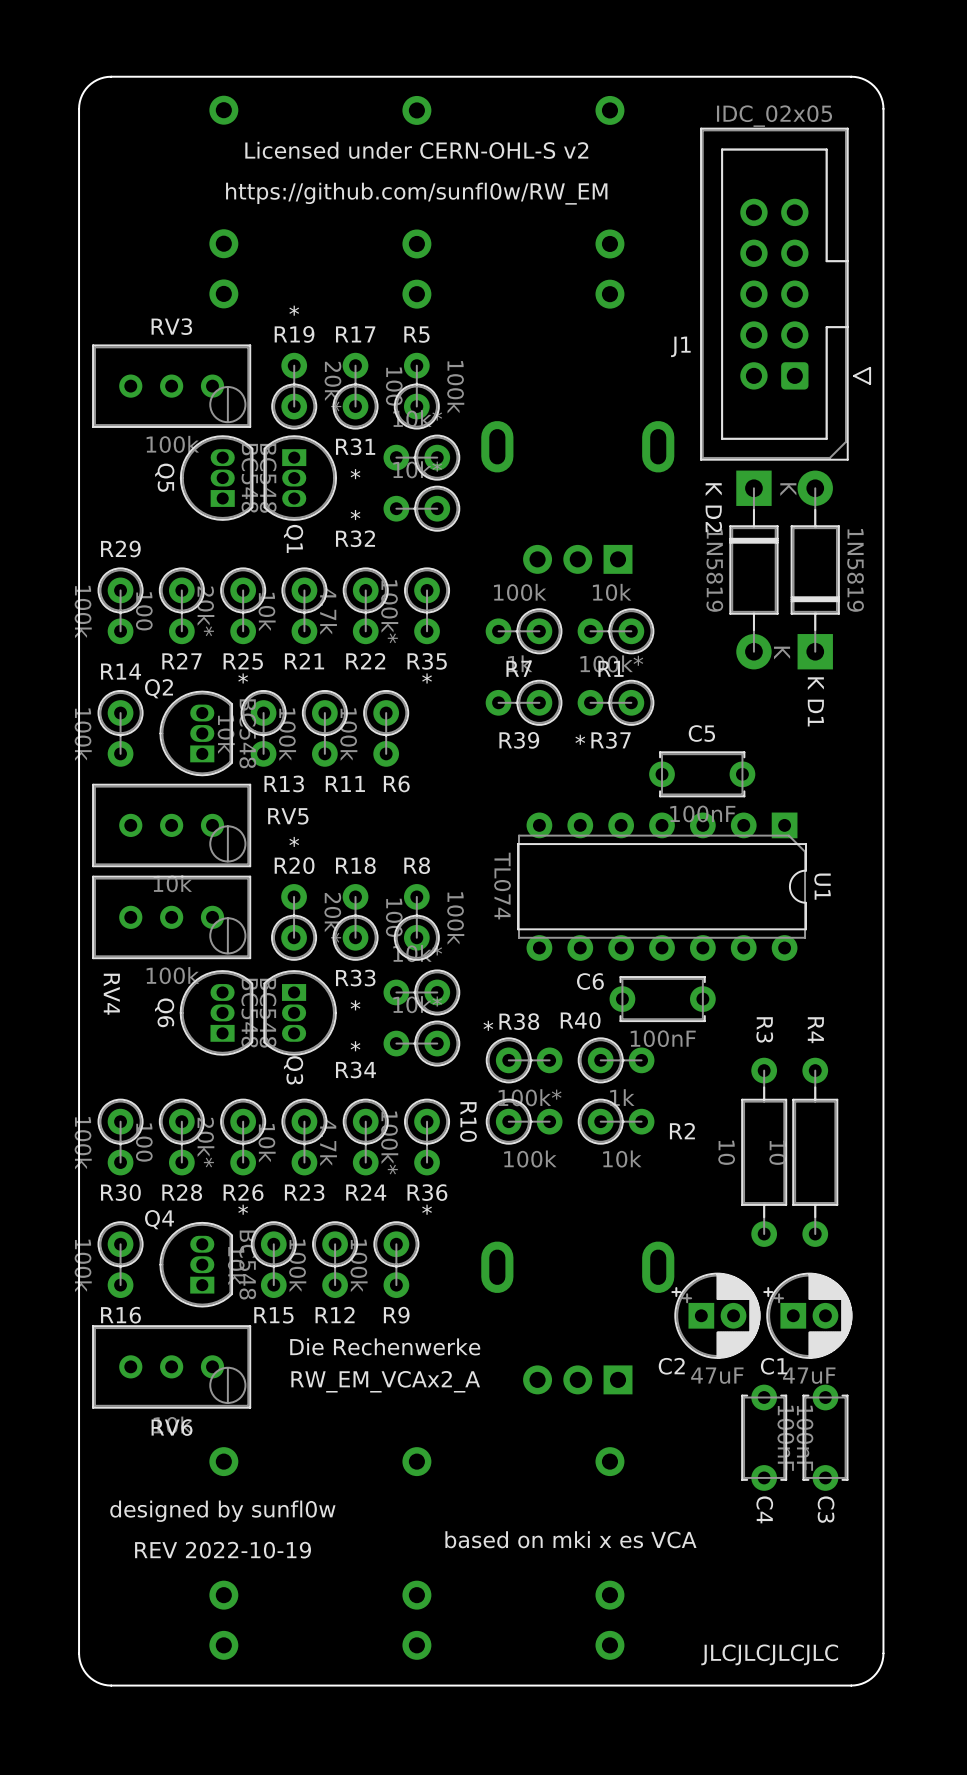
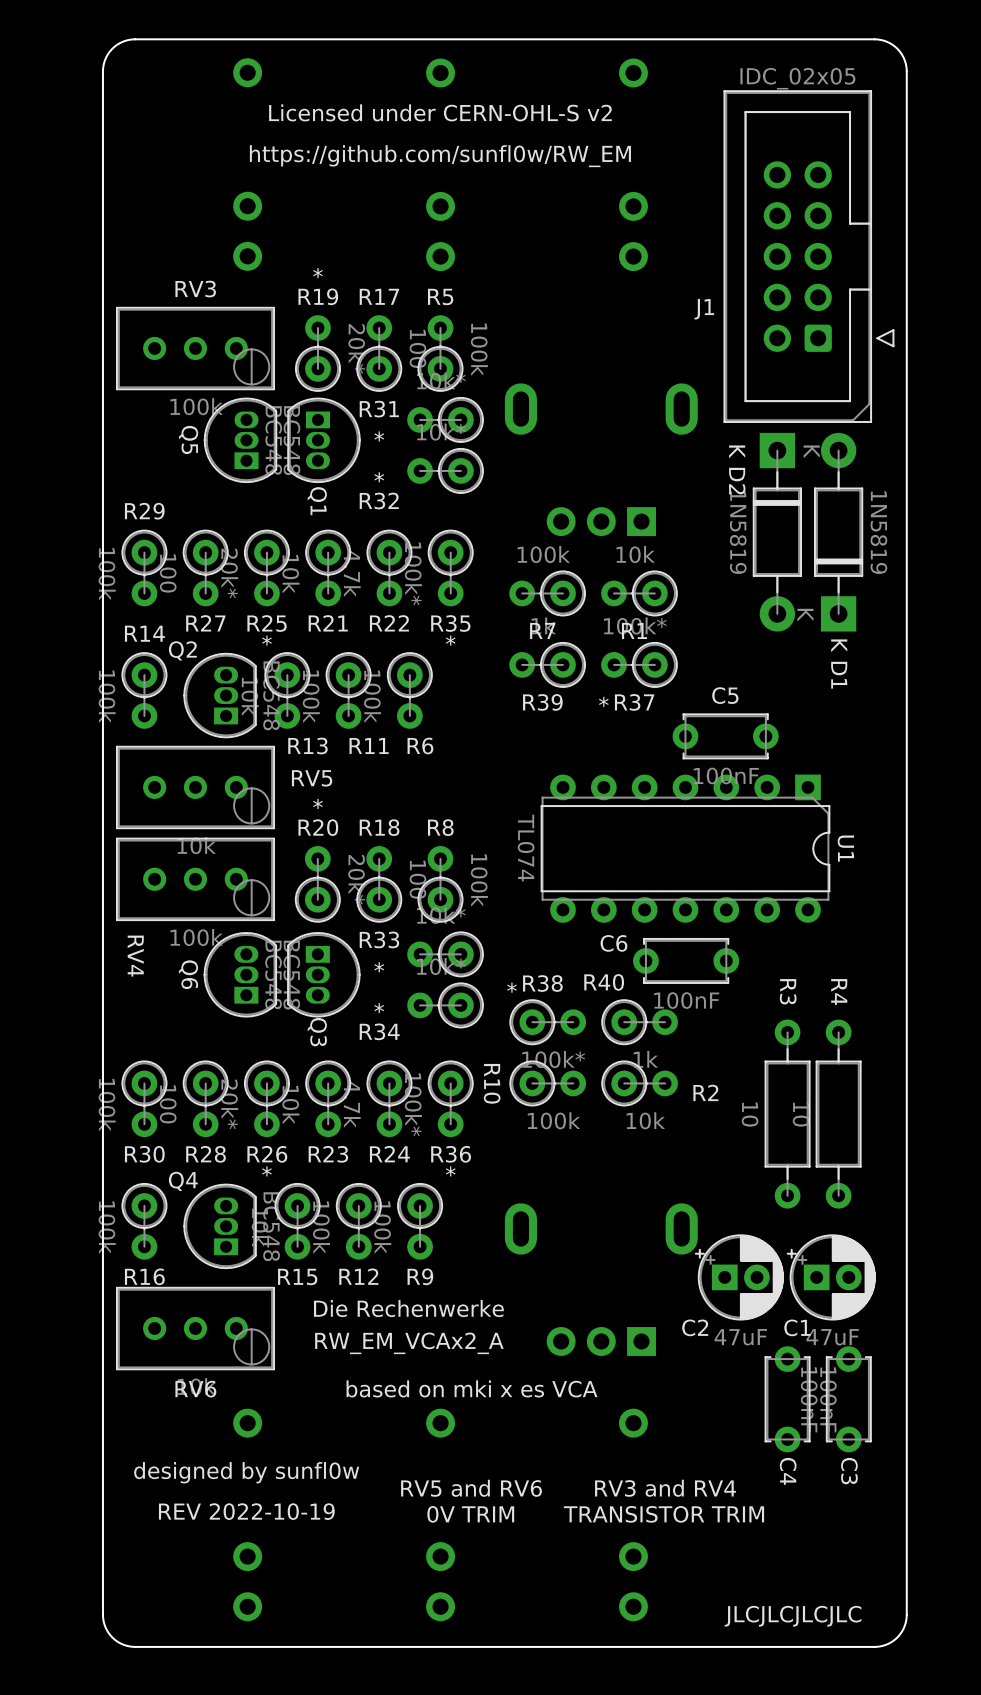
text: none -> RV5 and RV6 (471, 1488)
text: none -> RV3 and RV4 (665, 1488)
text position: based on mki x es VCA (570, 1539) -> based on mki x es VCA (472, 1388)
text: none -> 0V TRIM (470, 1514)
text: none -> TRANSISTOR TRIM (663, 1514)

